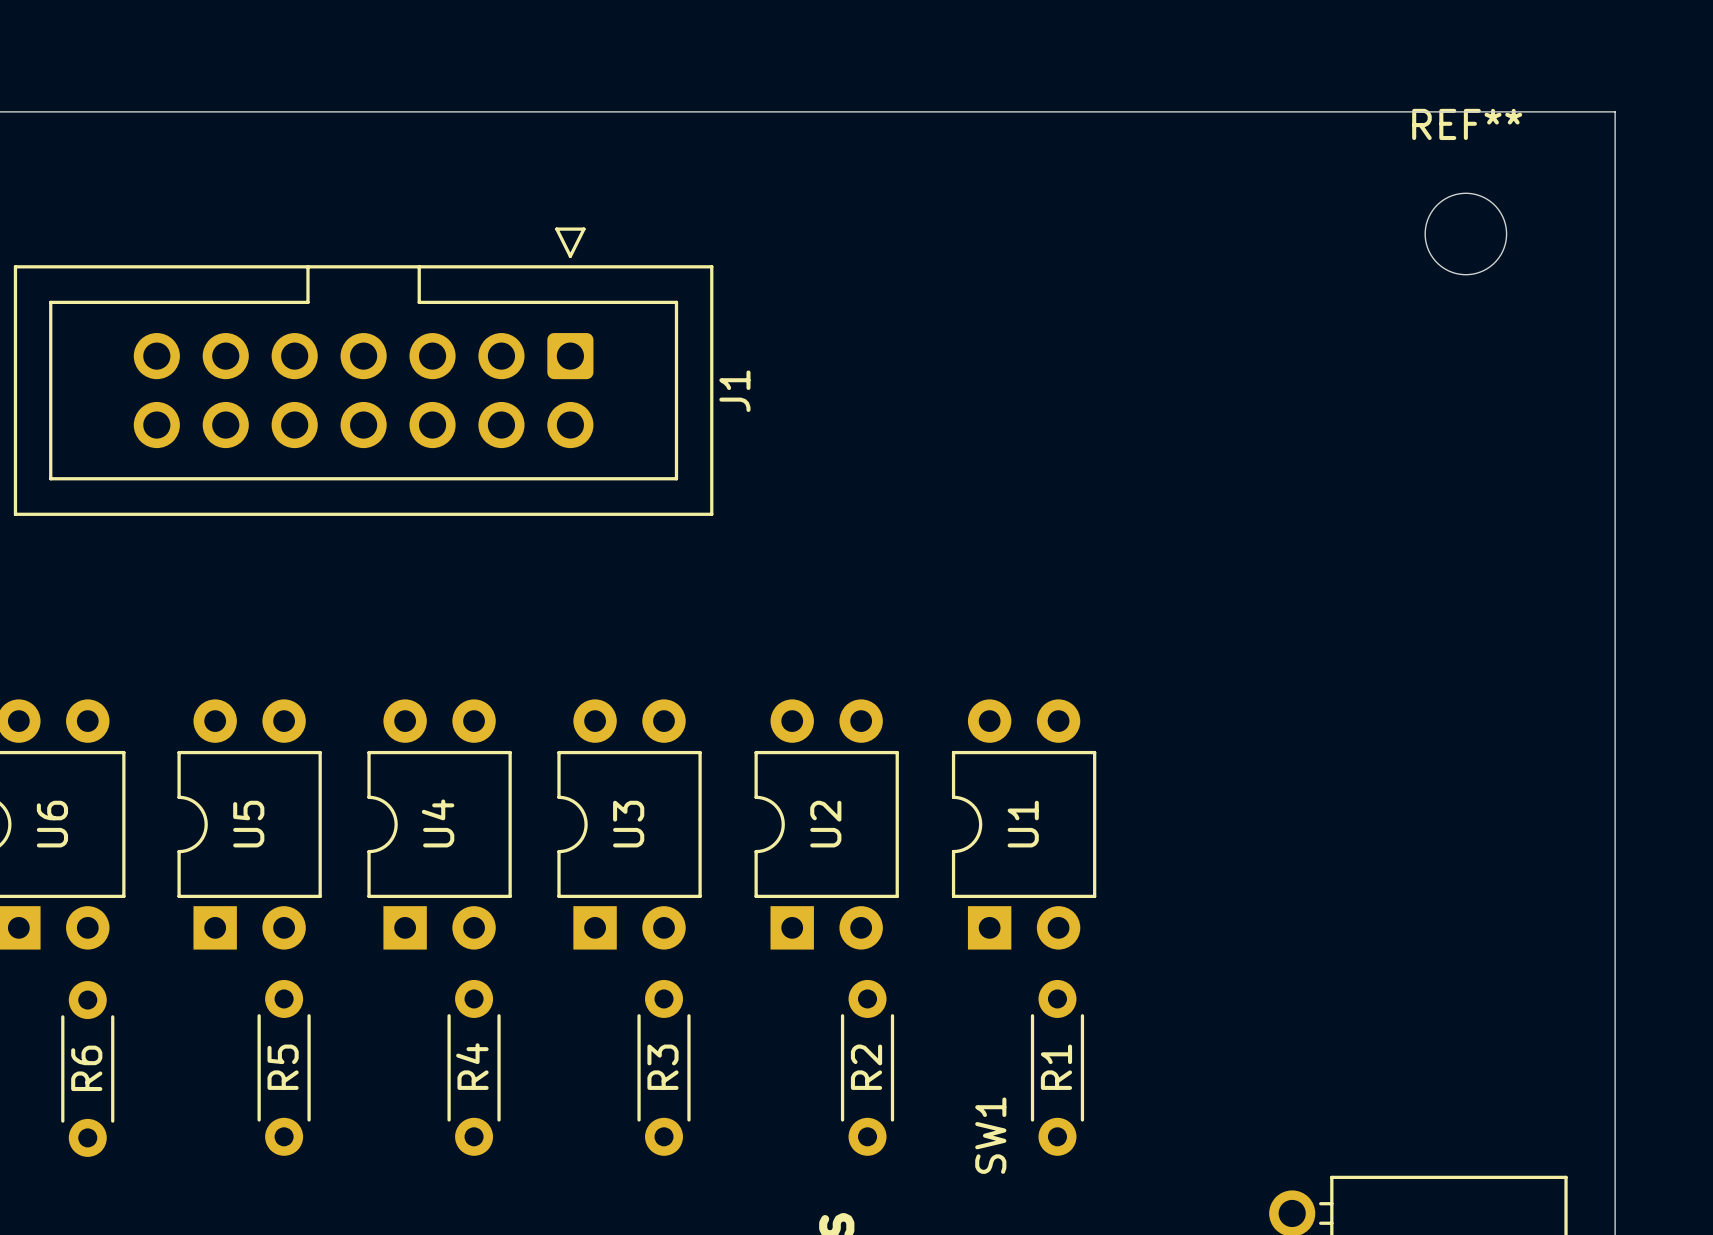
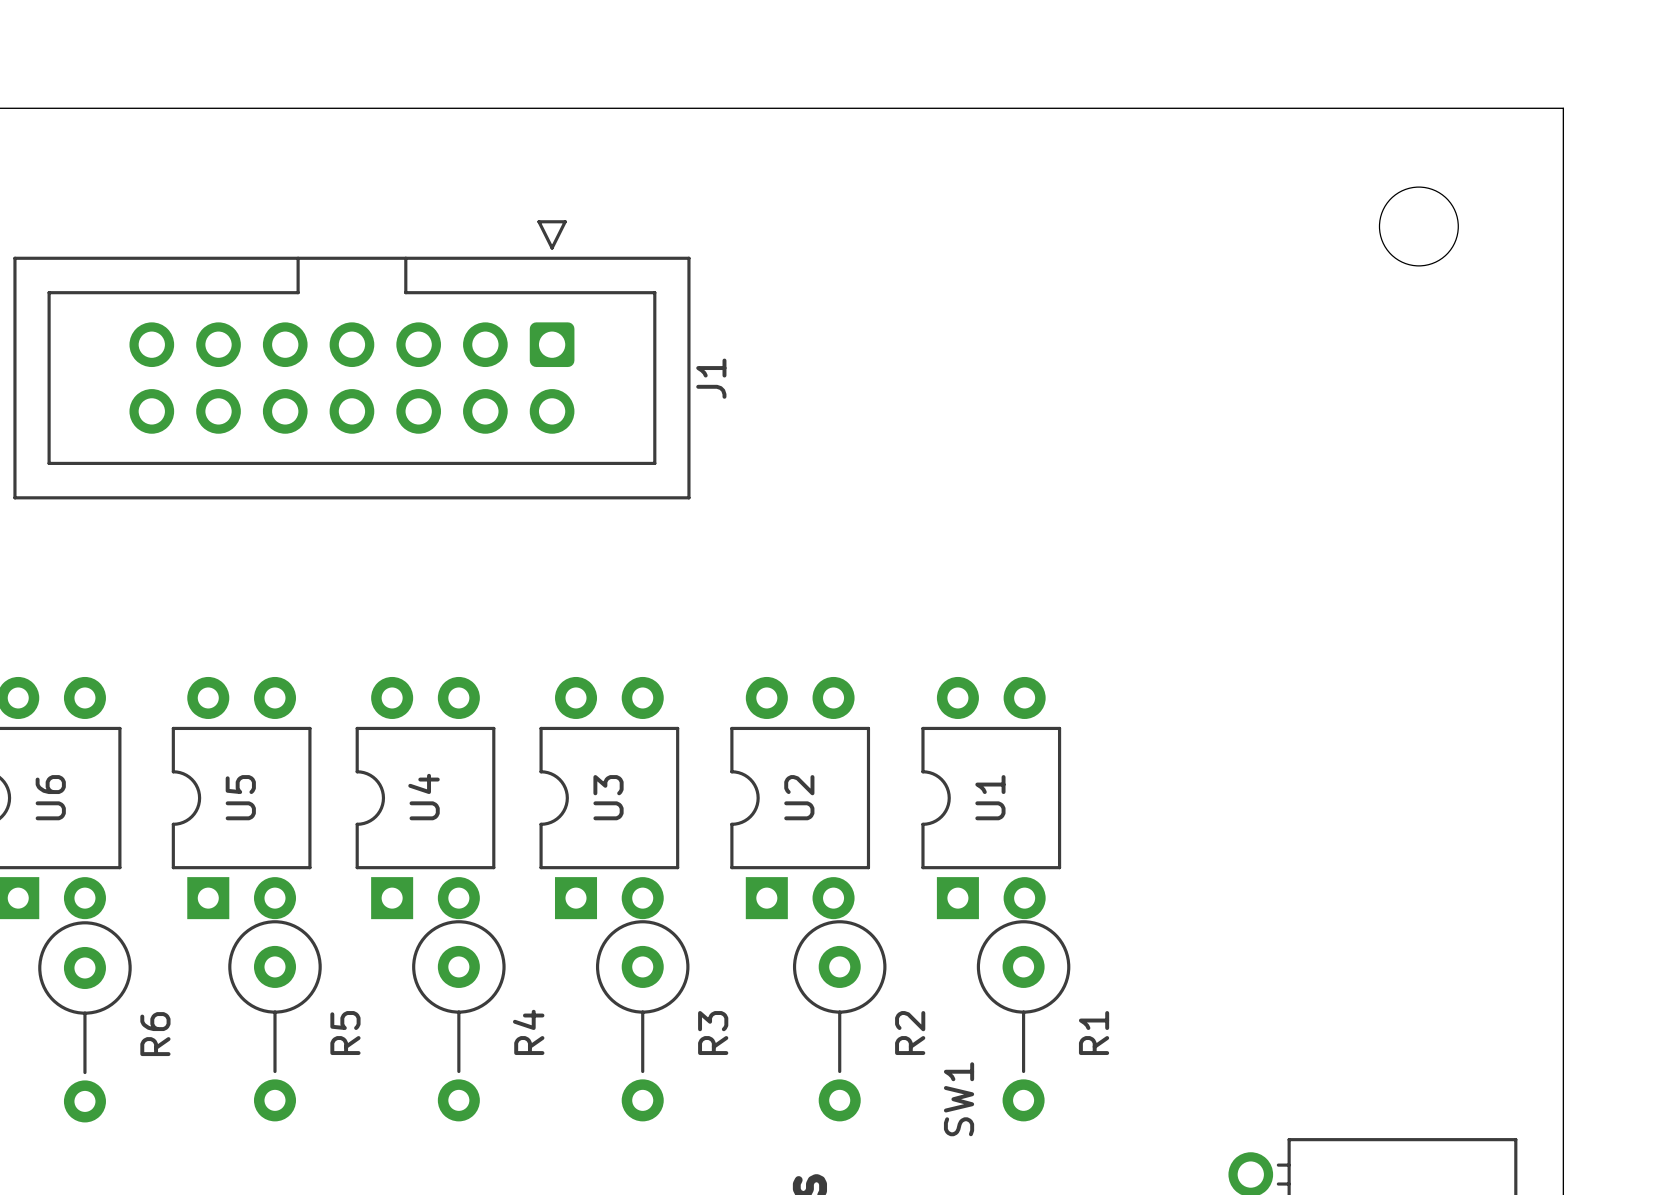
REF** name: REF** (1467, 124) -> none
R5 footprint: [257, 979, 311, 1156] -> [228, 920, 322, 1122]
R4 footprint: [447, 979, 501, 1156] -> [412, 920, 506, 1122]
R3 footprint: [637, 979, 691, 1156] -> [595, 920, 690, 1122]
R2 footprint: [840, 979, 895, 1156] -> [792, 920, 887, 1122]
R1 footprint: [1030, 979, 1085, 1156] -> [976, 920, 1071, 1122]
R6 footprint: [61, 981, 115, 1157] -> [38, 921, 132, 1123]
R4 name position: R4 (472, 1066) -> R4 (528, 1032)
R5 name position: R5 (283, 1067) -> R5 (345, 1033)
R3 name position: R3 (662, 1067) -> R3 (713, 1033)
R2 name position: R2 (866, 1067) -> R2 (910, 1033)
R1 name position: R1 (1056, 1067) -> R1 (1094, 1033)
R6 name position: R6 (86, 1068) -> R6 (155, 1034)

